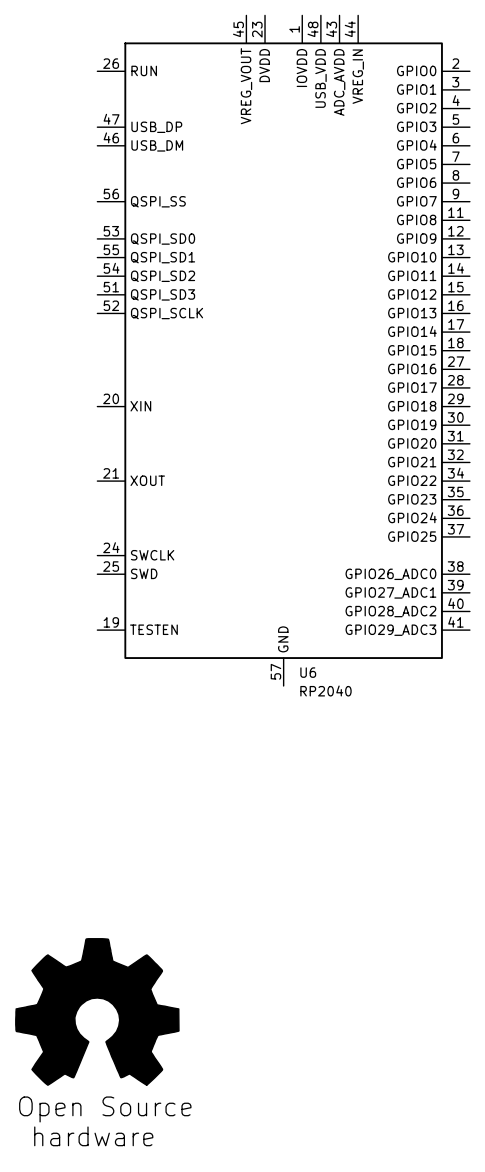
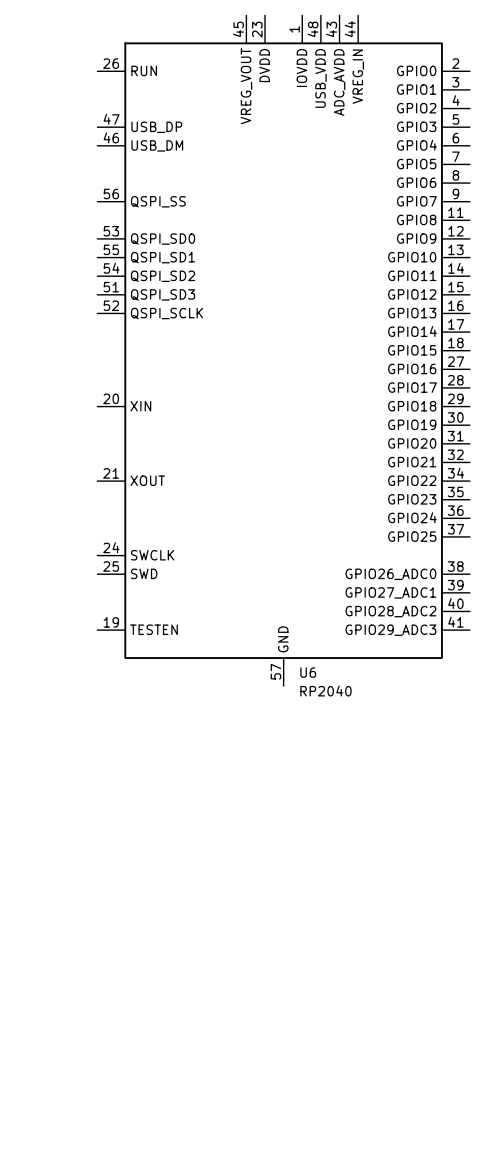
power symbol: (97, 1011) -> none
text: Open Source (105, 1109) -> none
text: hardware (93, 1136) -> none

